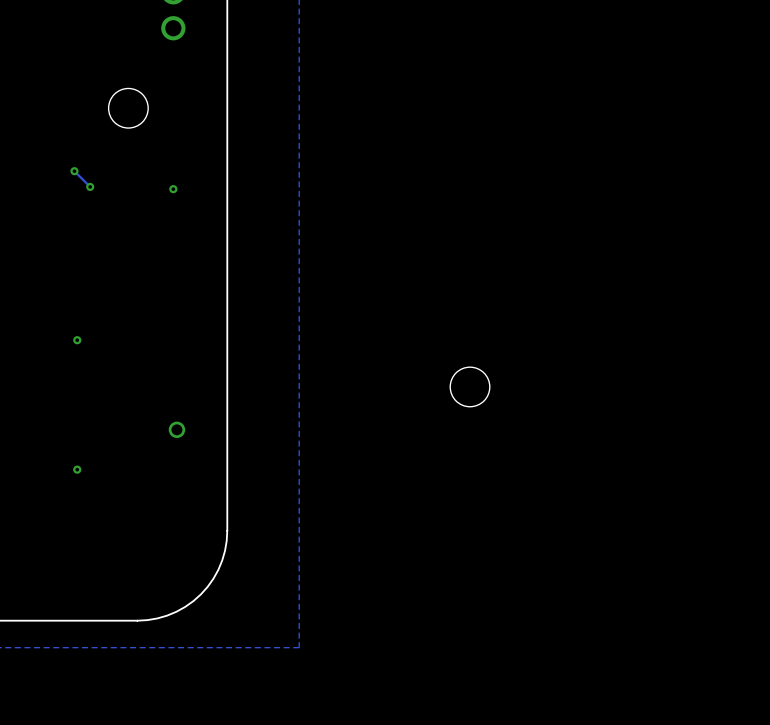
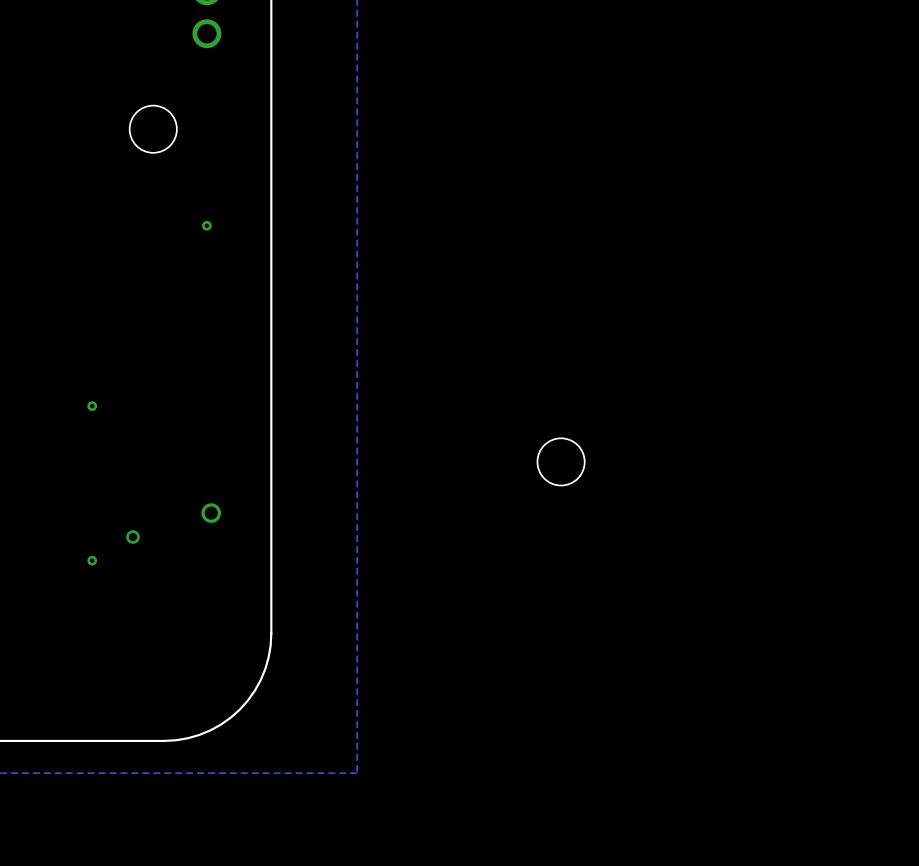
track: (74, 171) (90, 186) -> none
via: (74, 171) -> none
via: (90, 186) -> none
via: none -> (133, 537)

